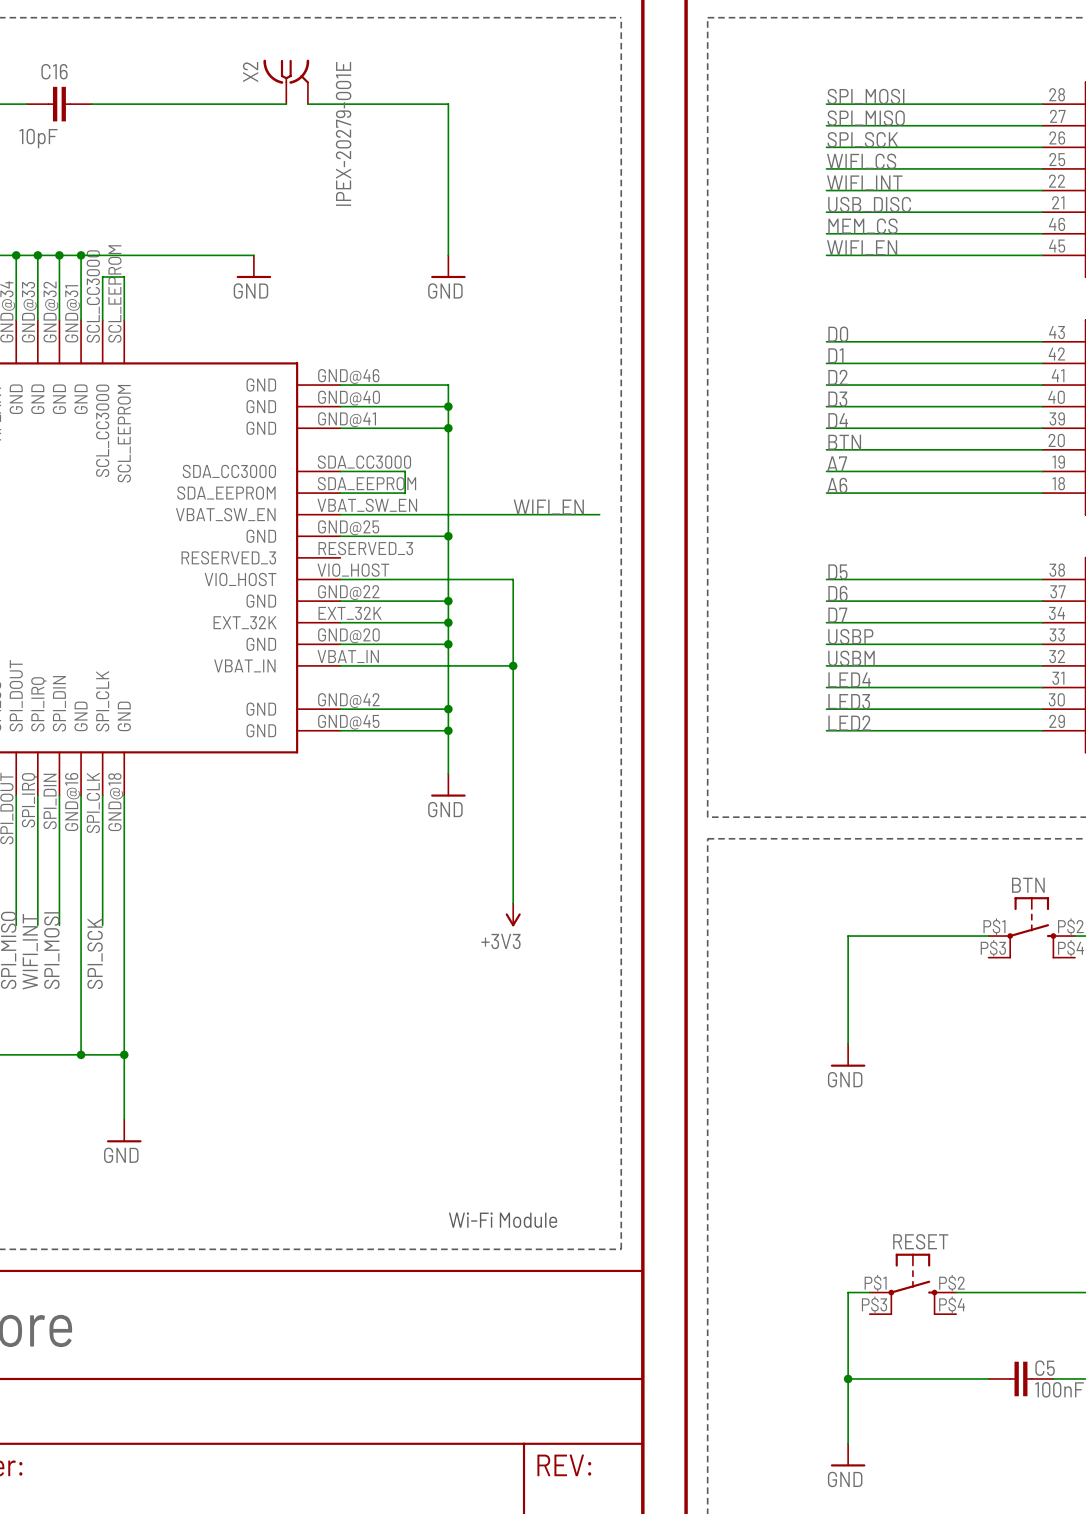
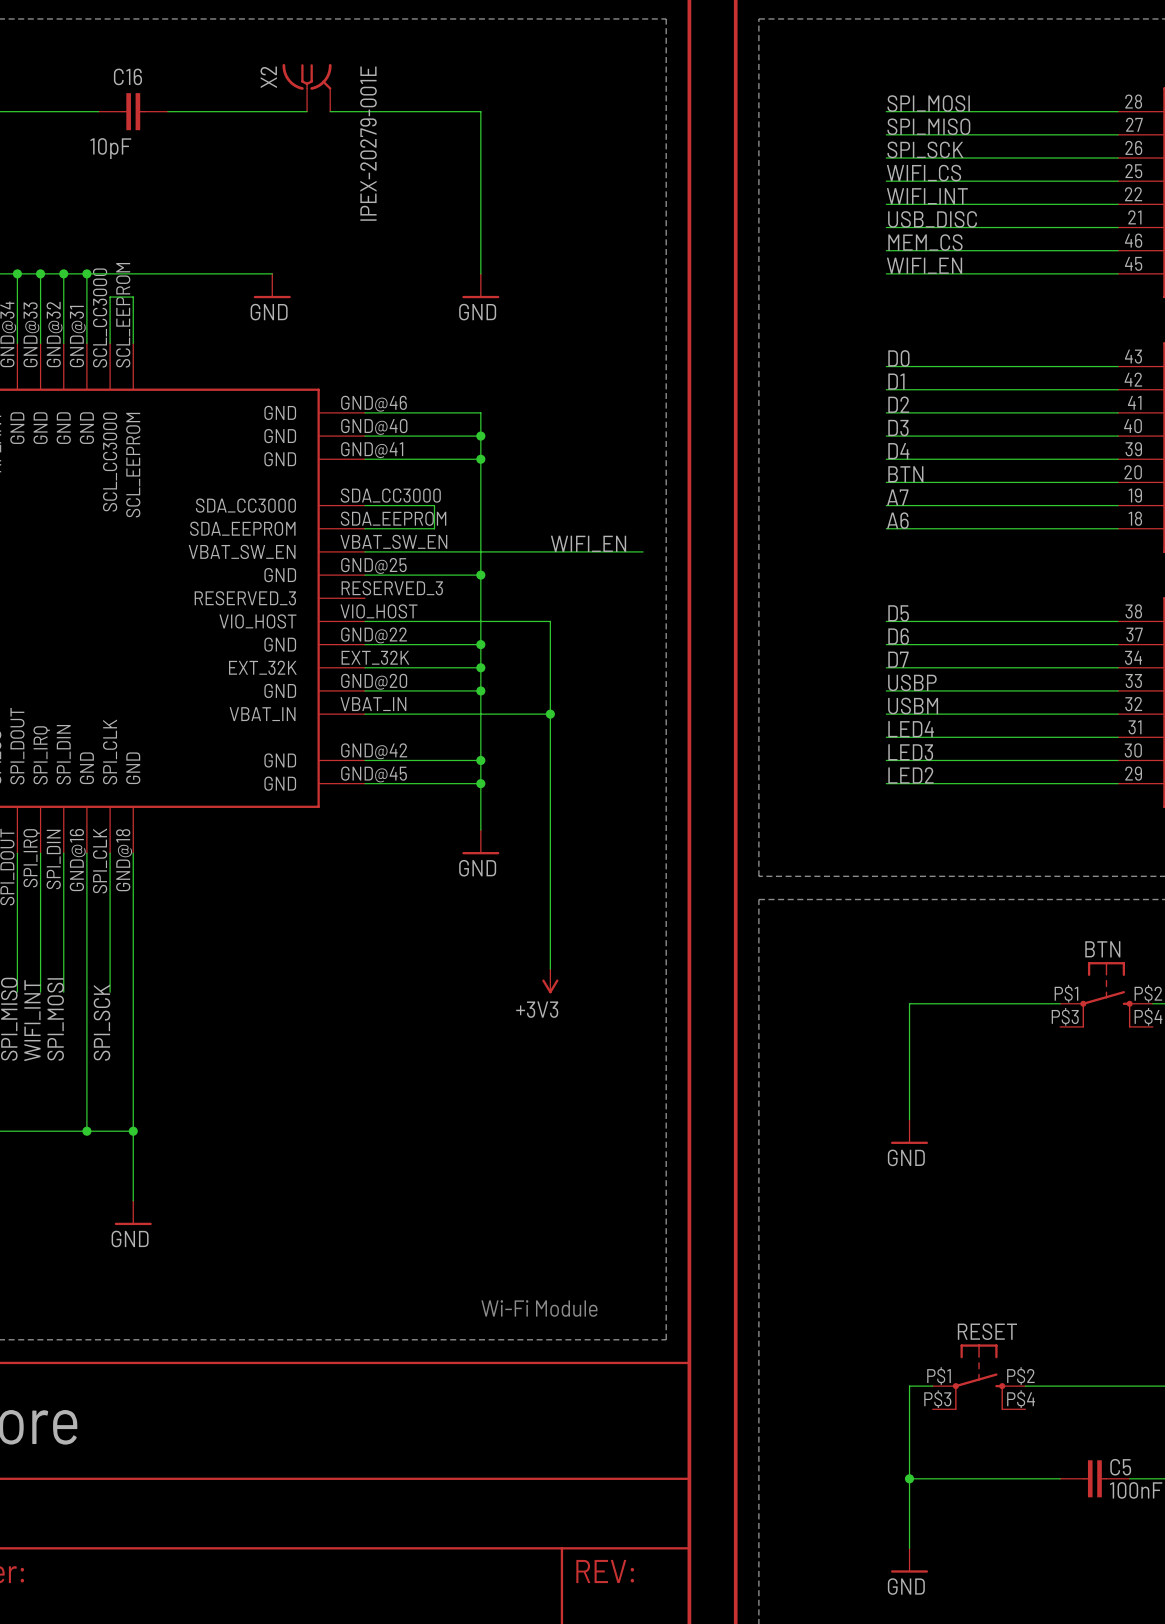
C16 position: (59, 104) -> (133, 111)

